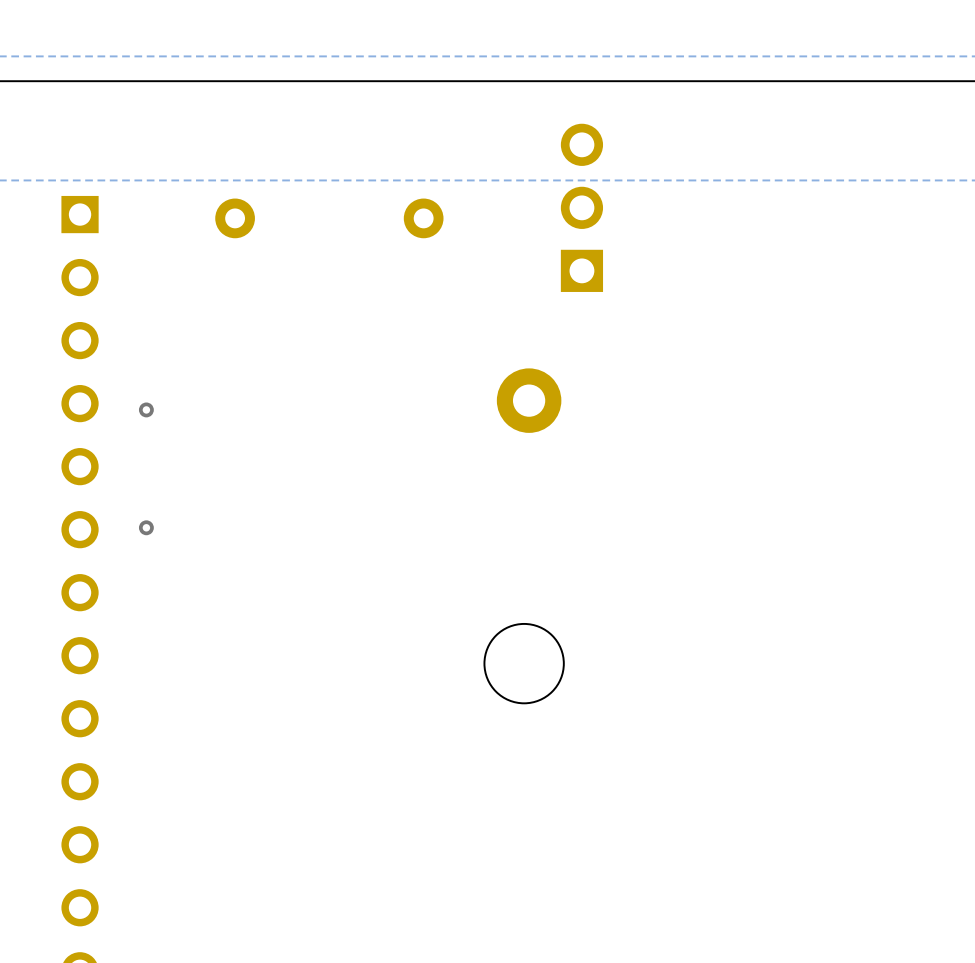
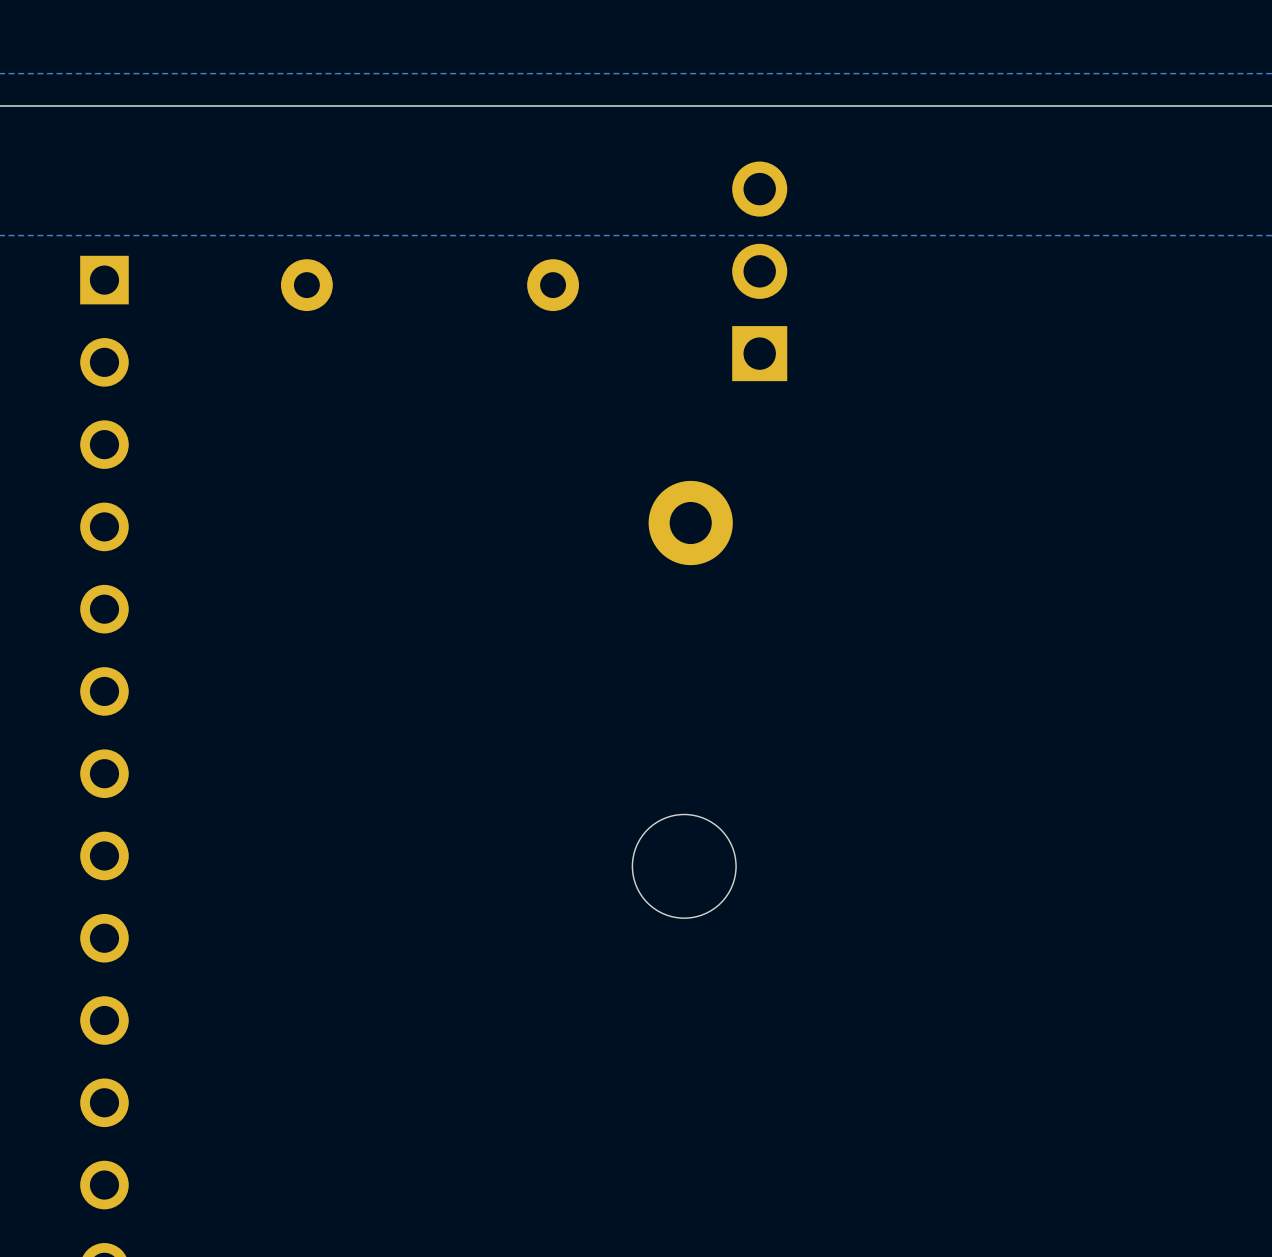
via: (146, 409) -> none
via: (146, 527) -> none

